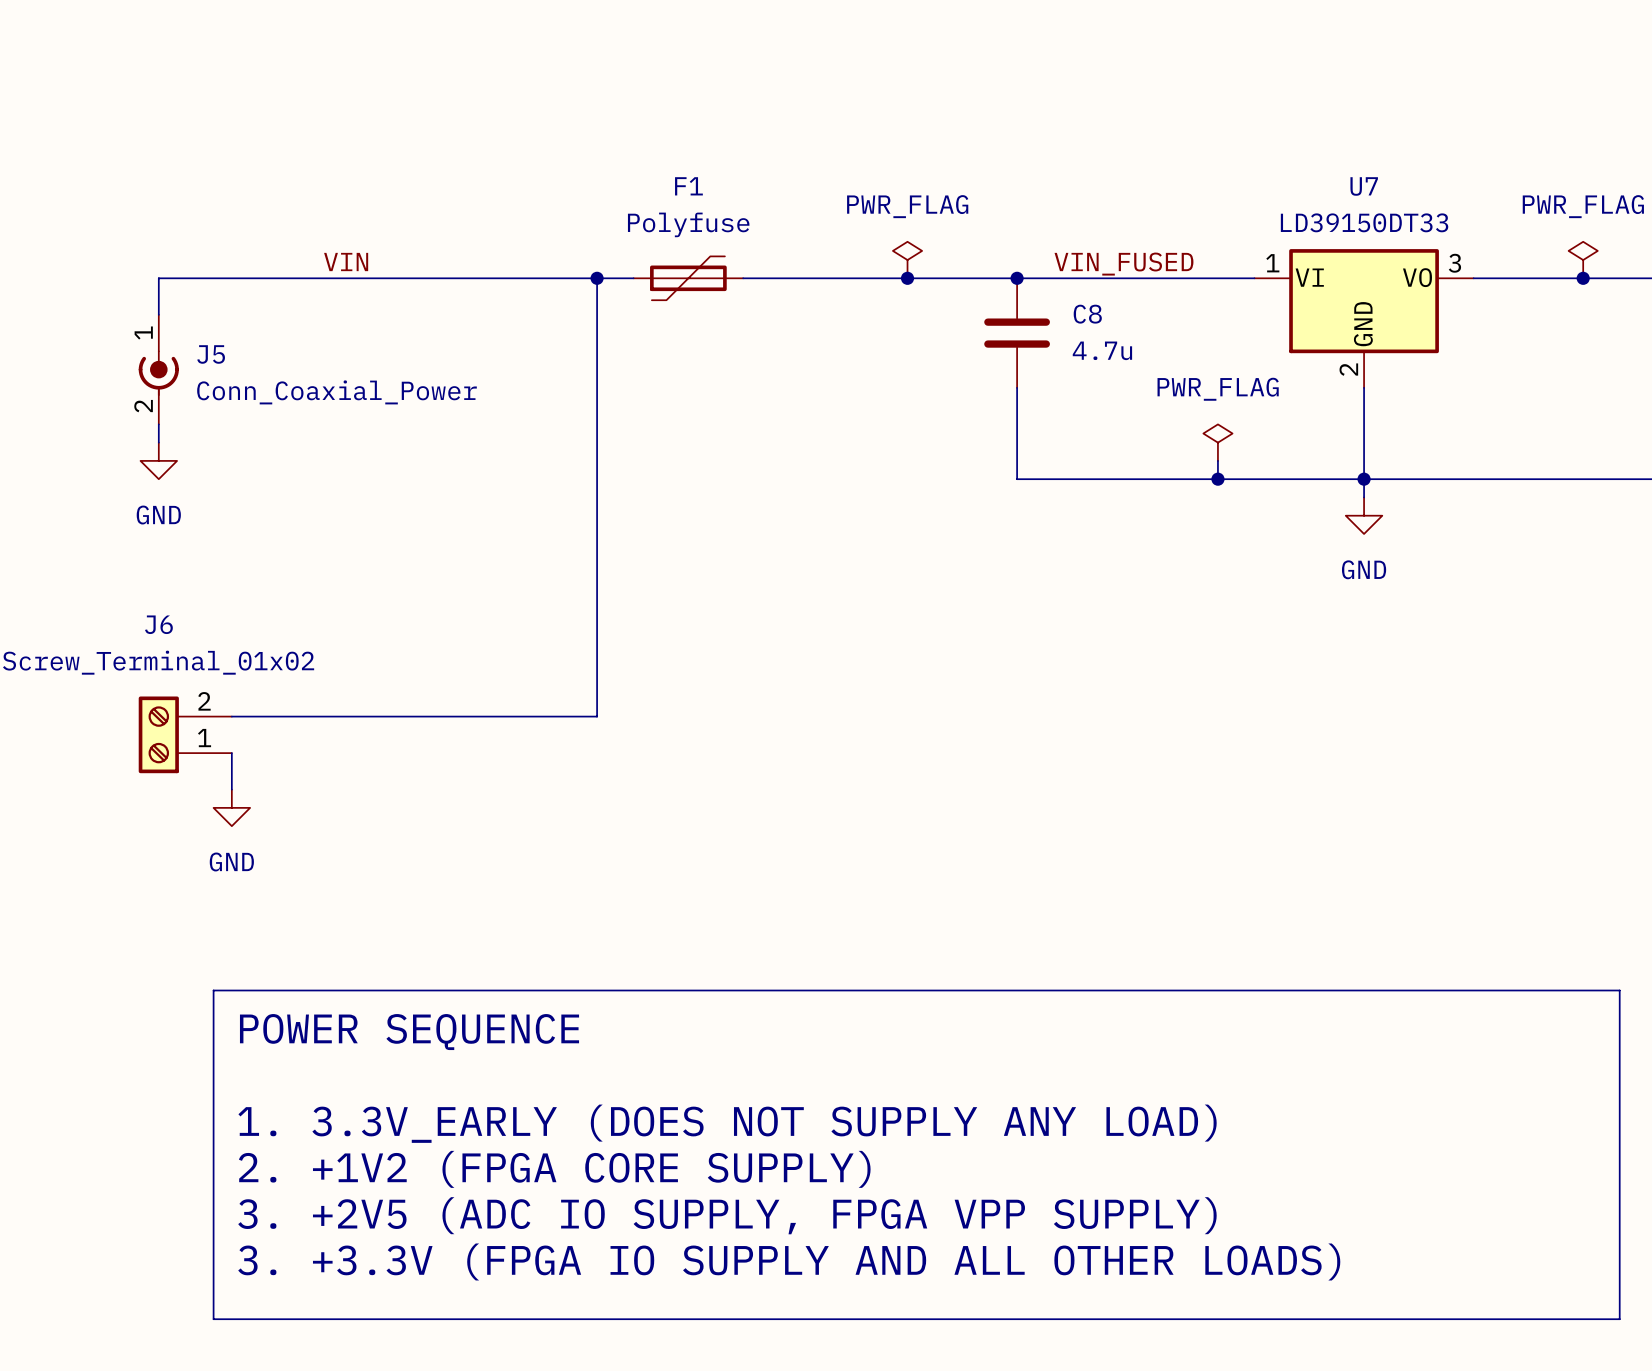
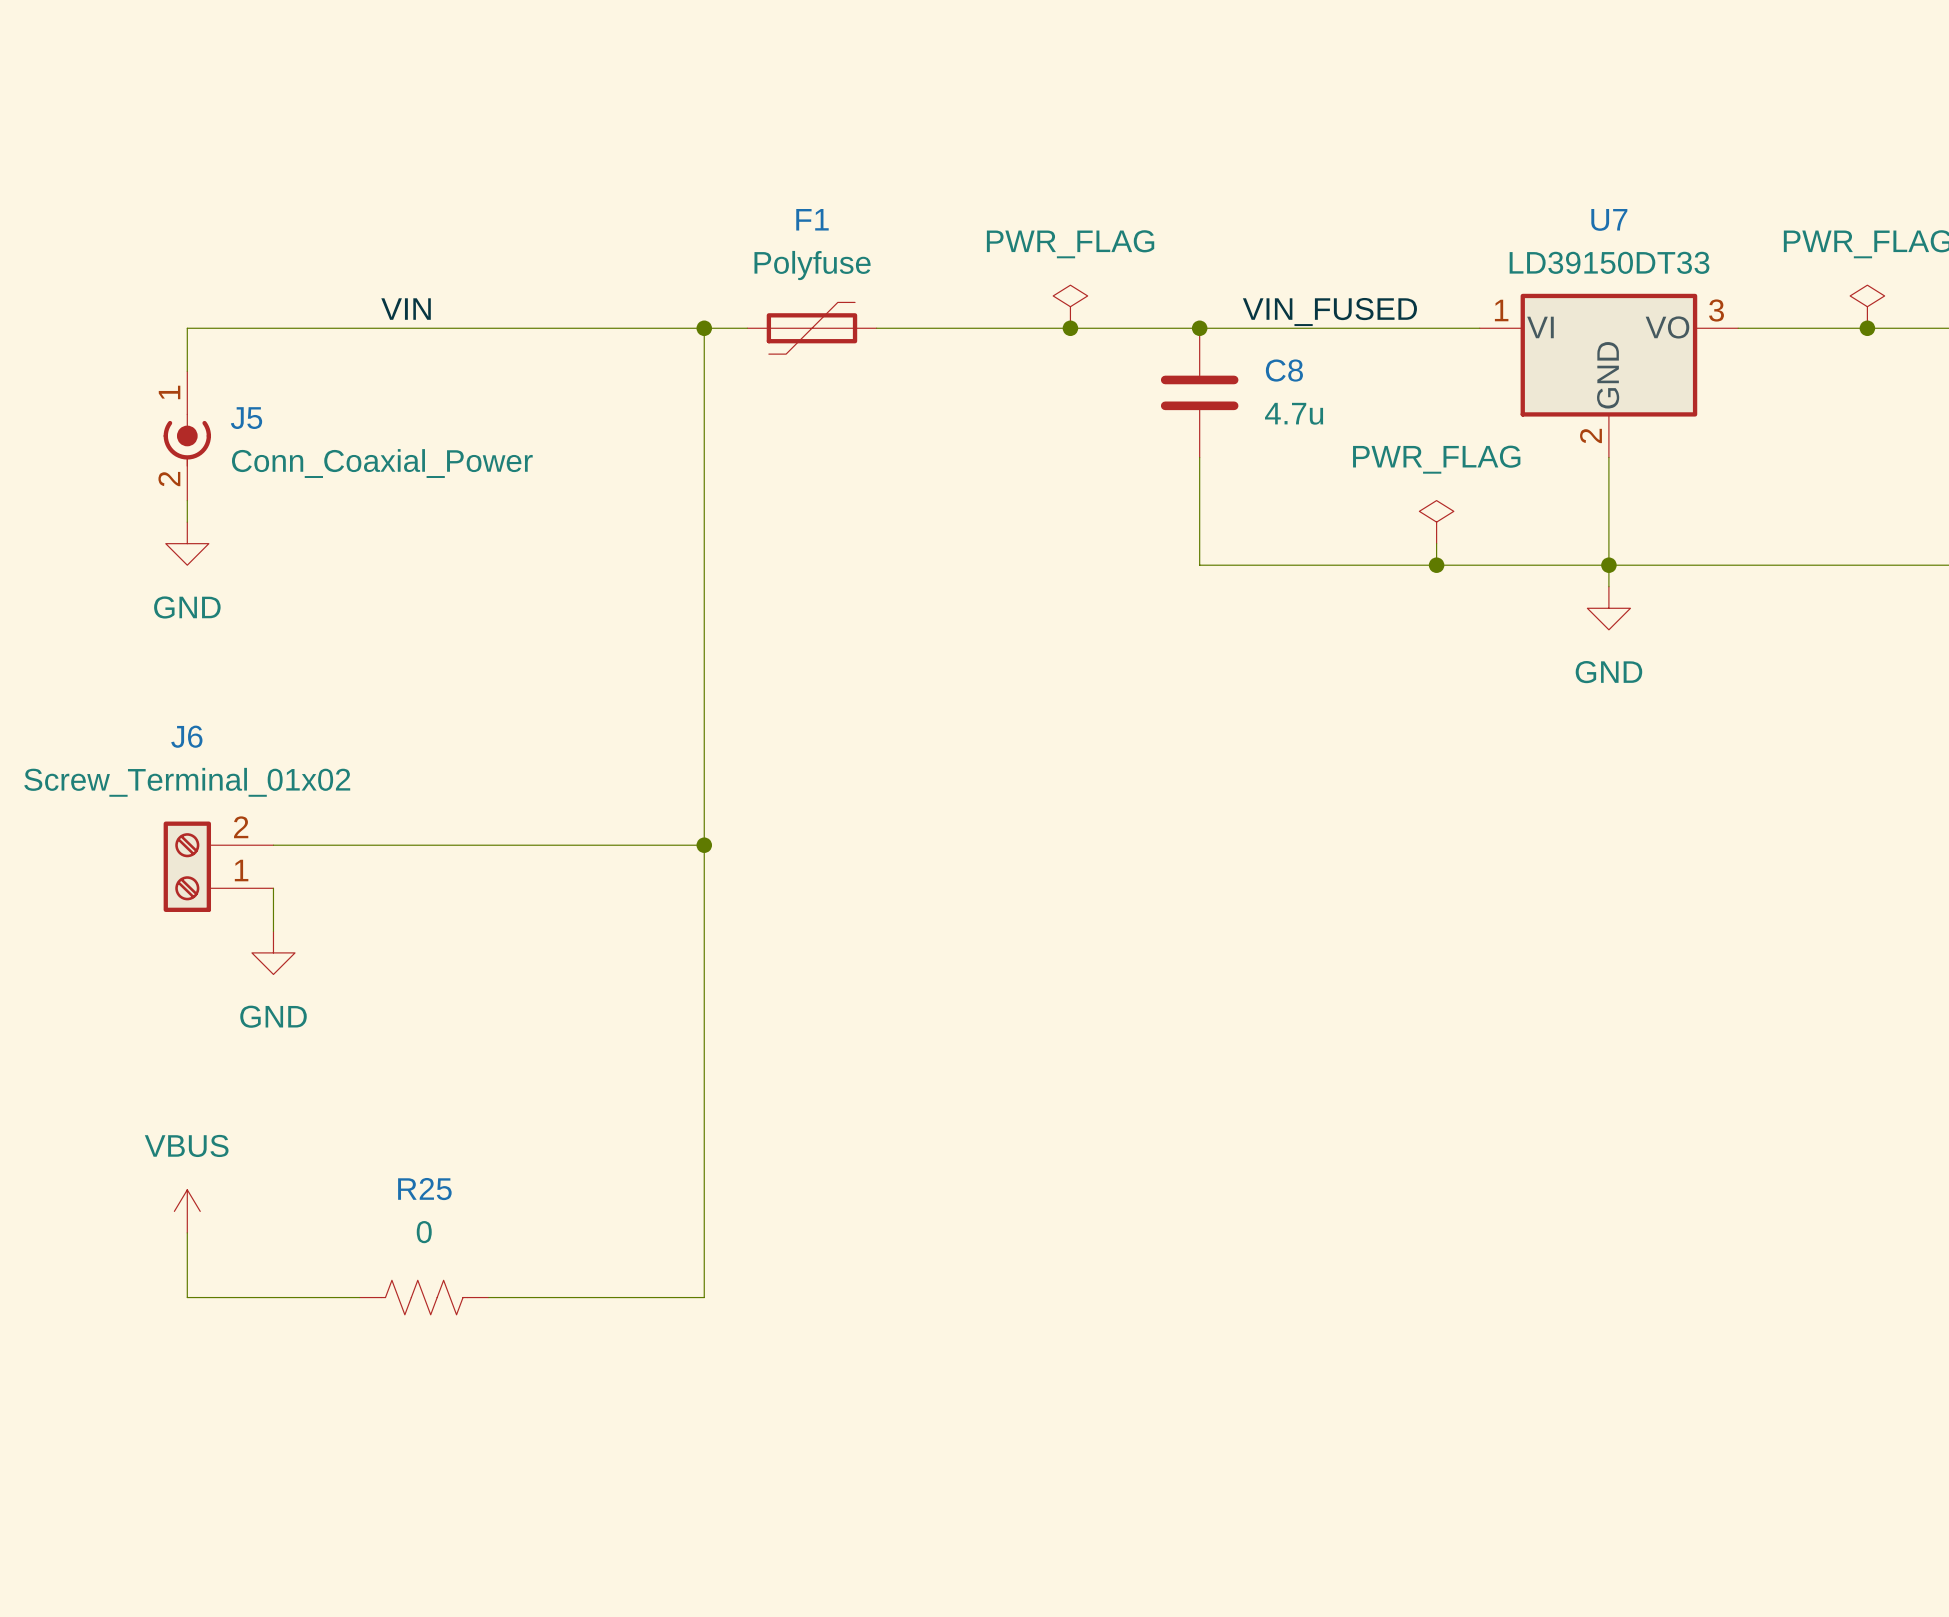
wire: none -> (704, 845) (704, 1297) (488, 1297)
junction: none -> (704, 845)
line: (213, 990) (1619, 990) (1619, 1319) (213, 1319) (213, 990) -> none
power symbol: none -> VBUS (187, 1211)
text: POWER SEQUENCE (409, 1032) -> none
wire: none -> (187, 1232) (187, 1297) (359, 1297)
R25: none -> 0 (424, 1297)
text: 1. 3.3V_EARLY (DOES NOT SUPPLY ANY LOAD) (727, 1123) -> none
text: 2. +1V2 (FPGA CORE SUPPLY) (554, 1169) -> none
text: 3. +2V5 (ADC IO SUPPLY, FPGA VPP SUPPLY) (727, 1215) -> none
text: 3. +3.3V (FPGA IO SUPPLY AND ALL OTHER LOADS) (789, 1261) -> none

